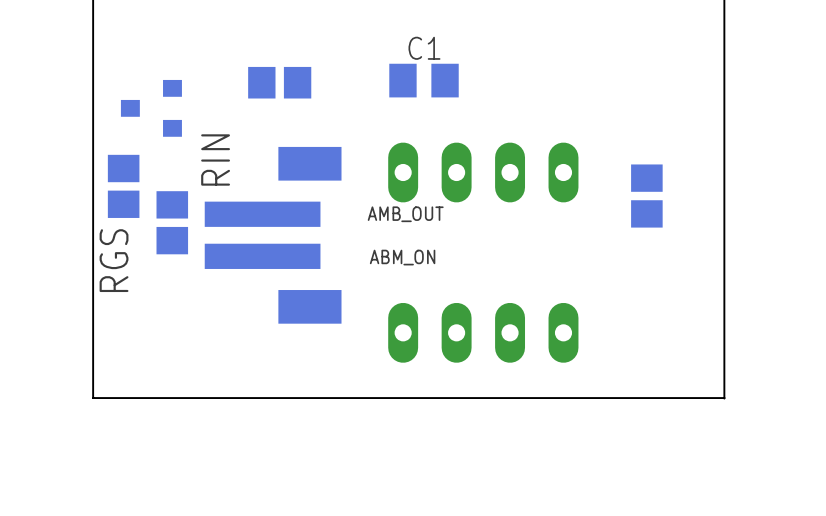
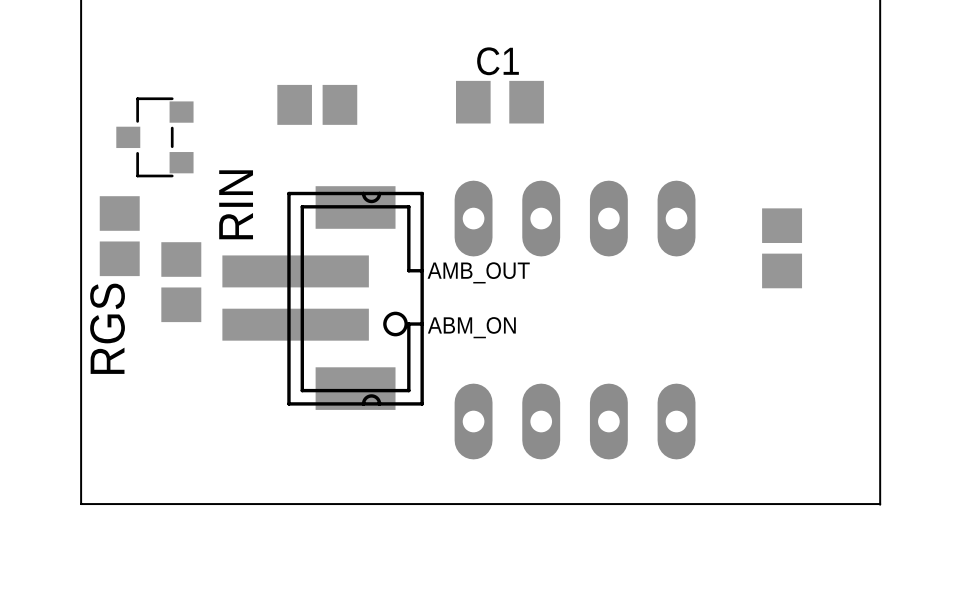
part footprint: [120, 79, 182, 137] -> [116, 97, 194, 178]
part footprint: [204, 146, 342, 324] -> [222, 186, 424, 410]

